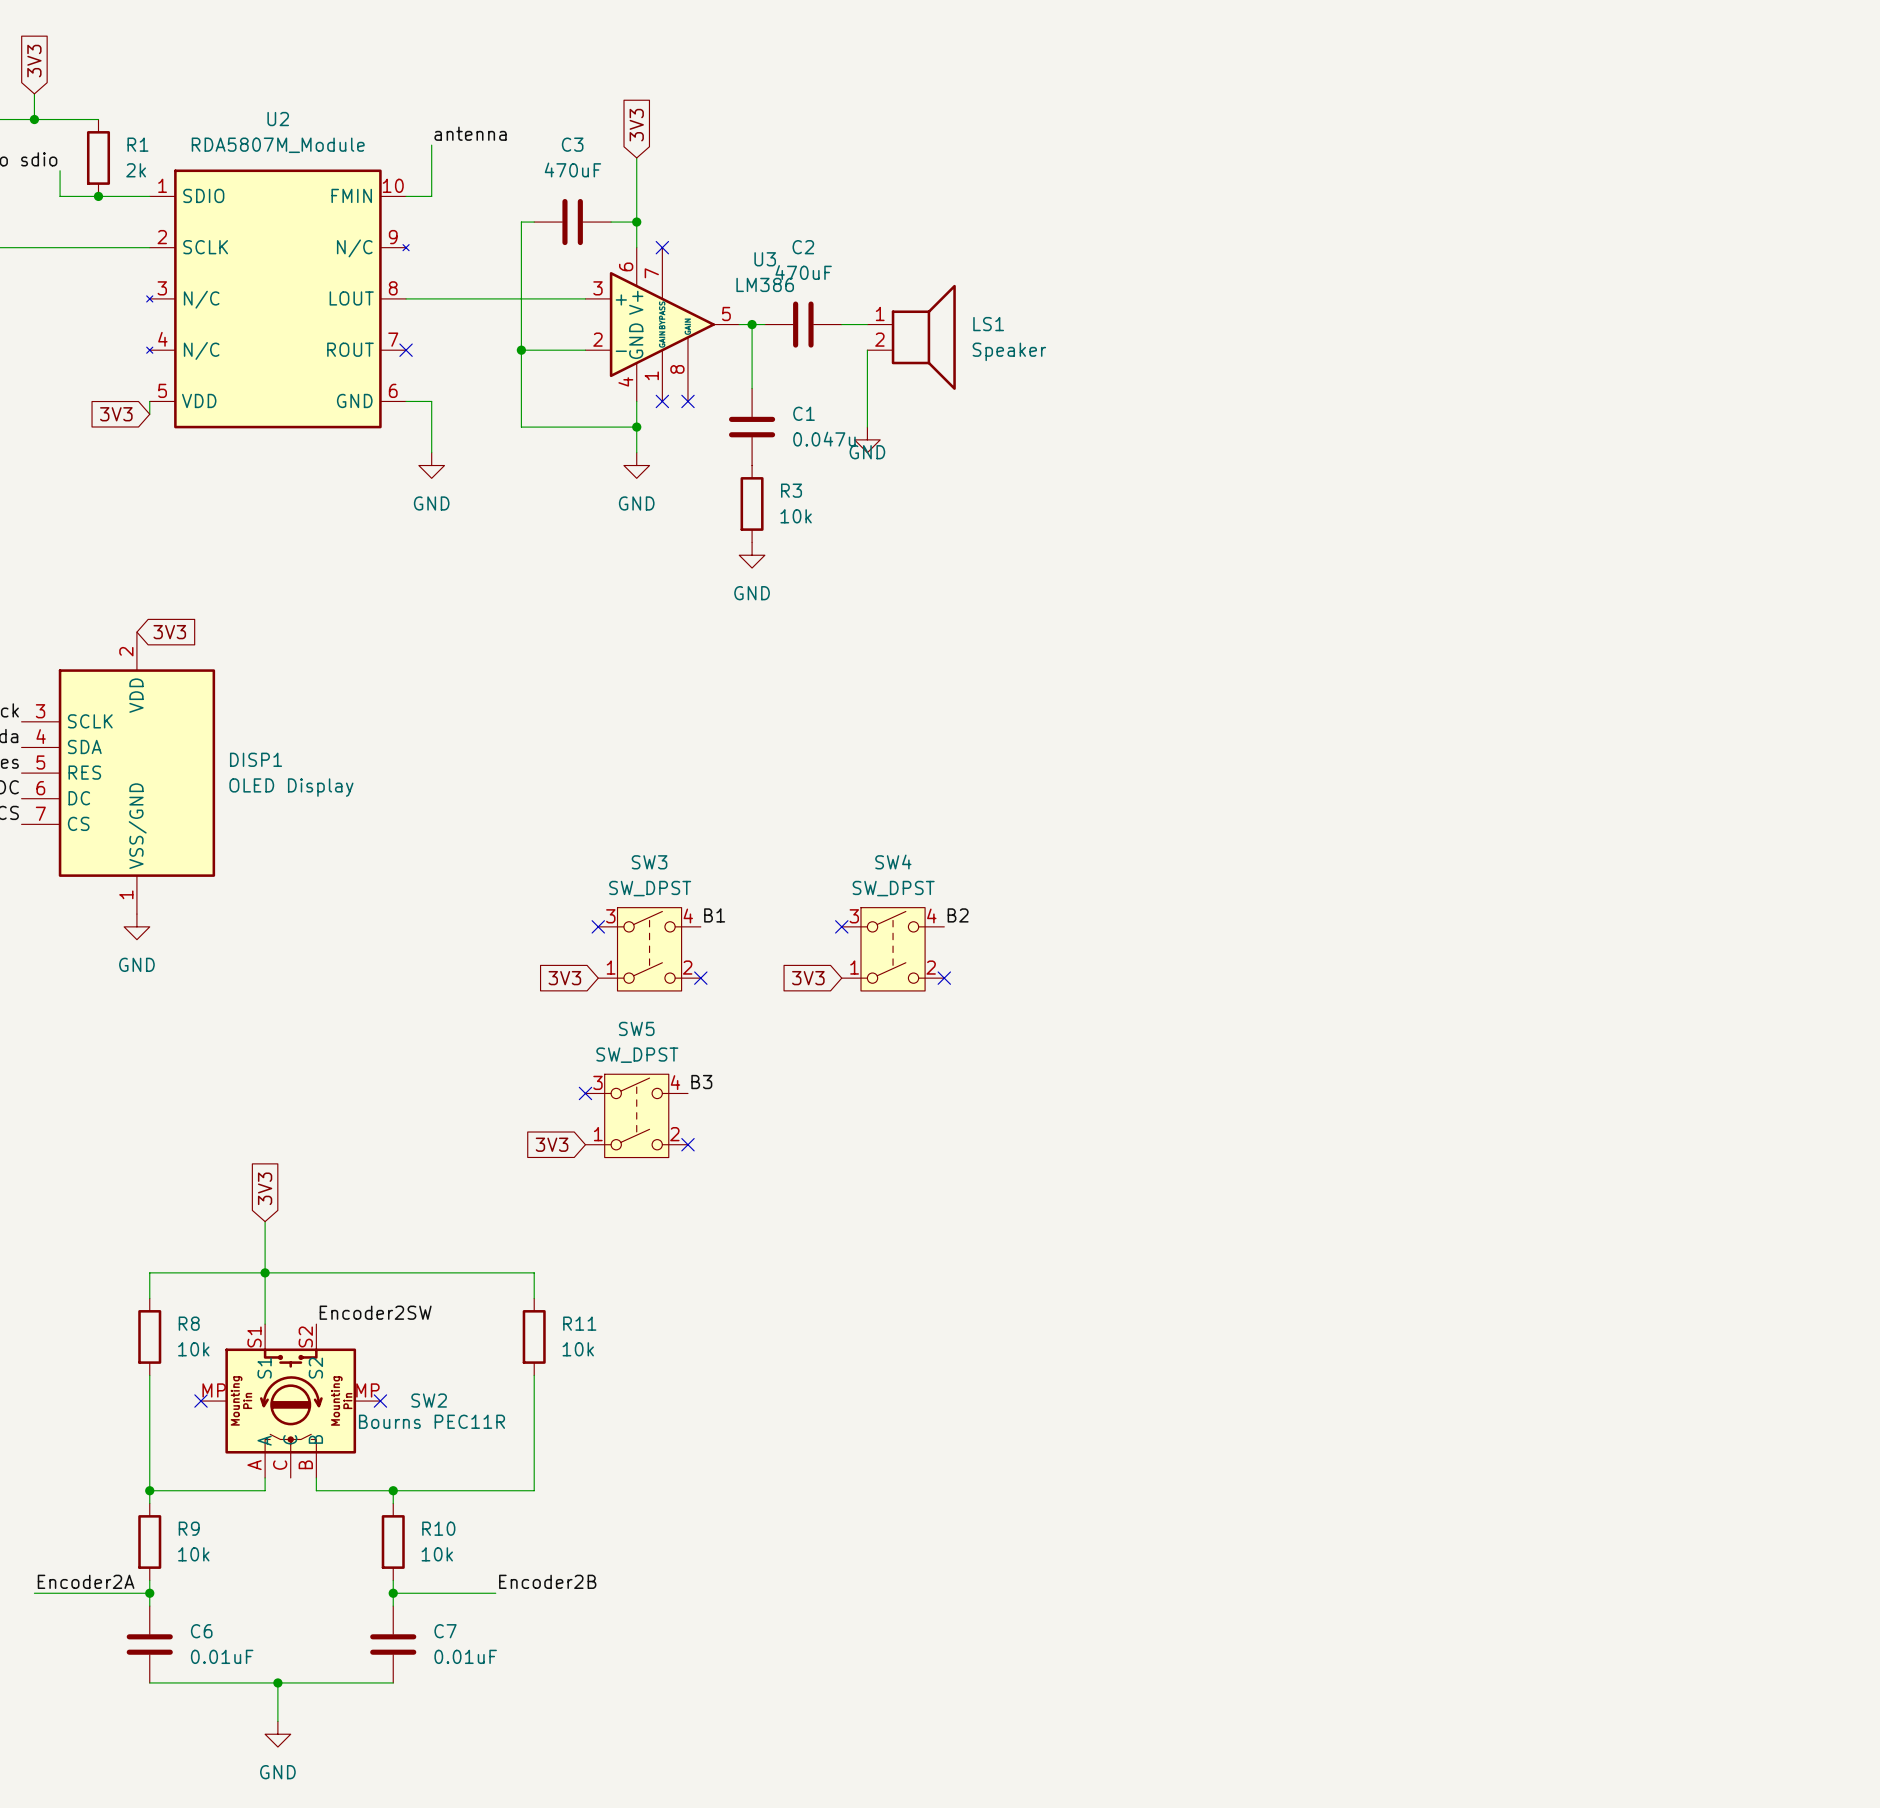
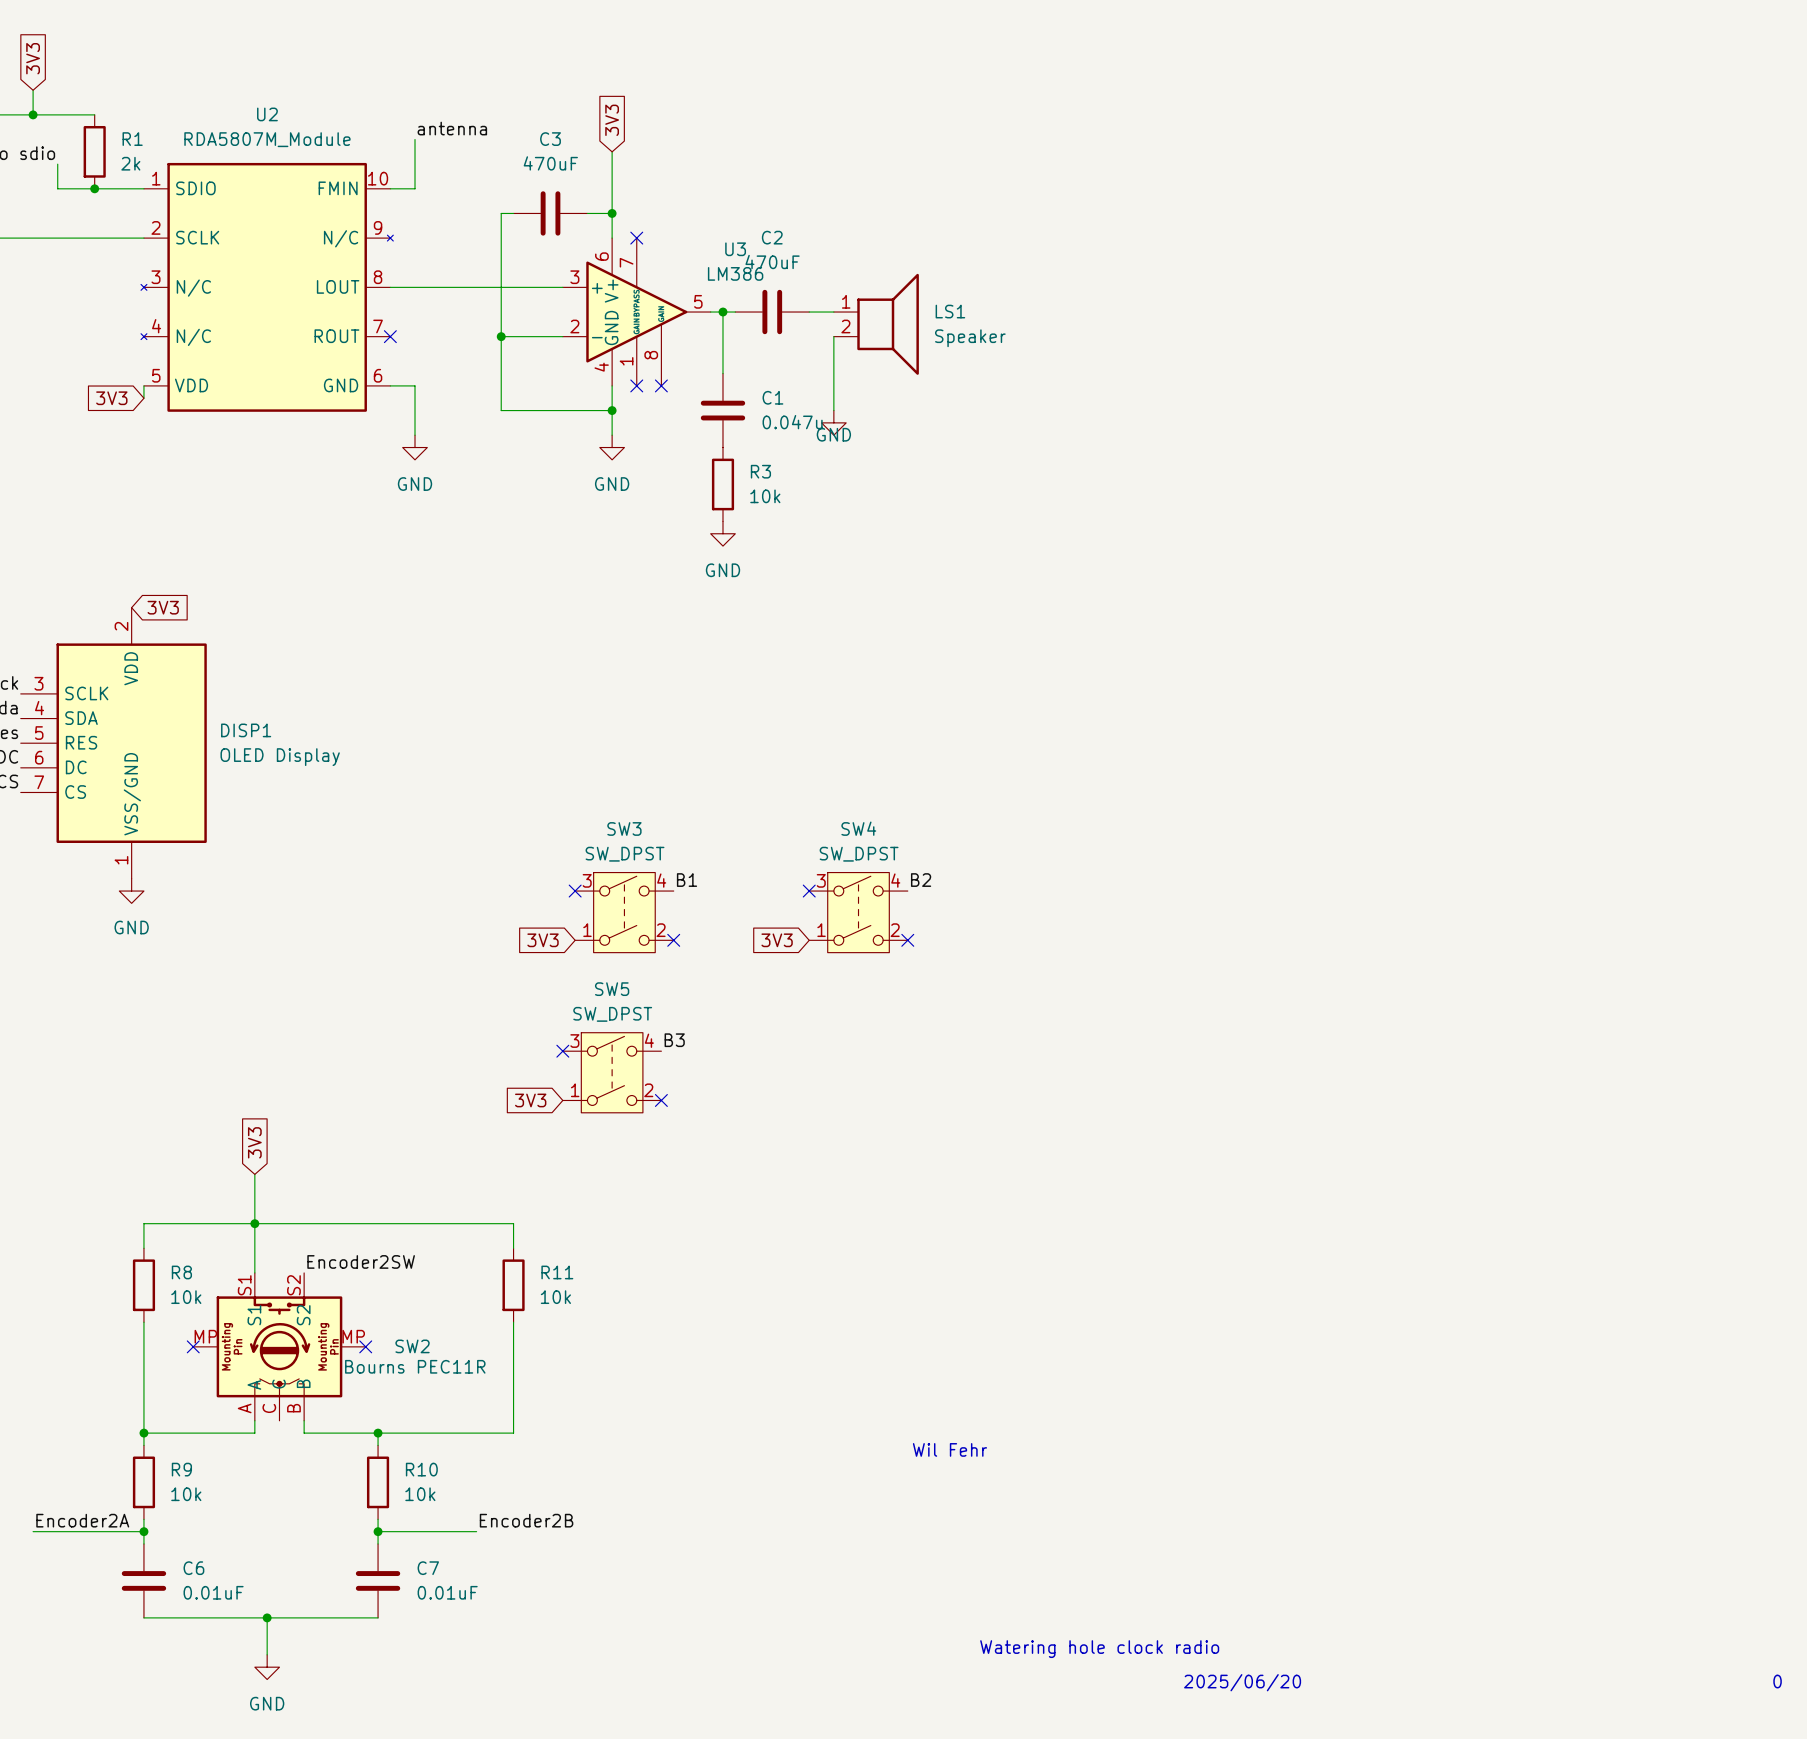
text: none -> Wil Fehr (949, 1449)
text: none -> Watering hole clock radio (1099, 1649)
text: none -> 0 (1777, 1681)
text: none -> 2025/06/20 (1242, 1682)

